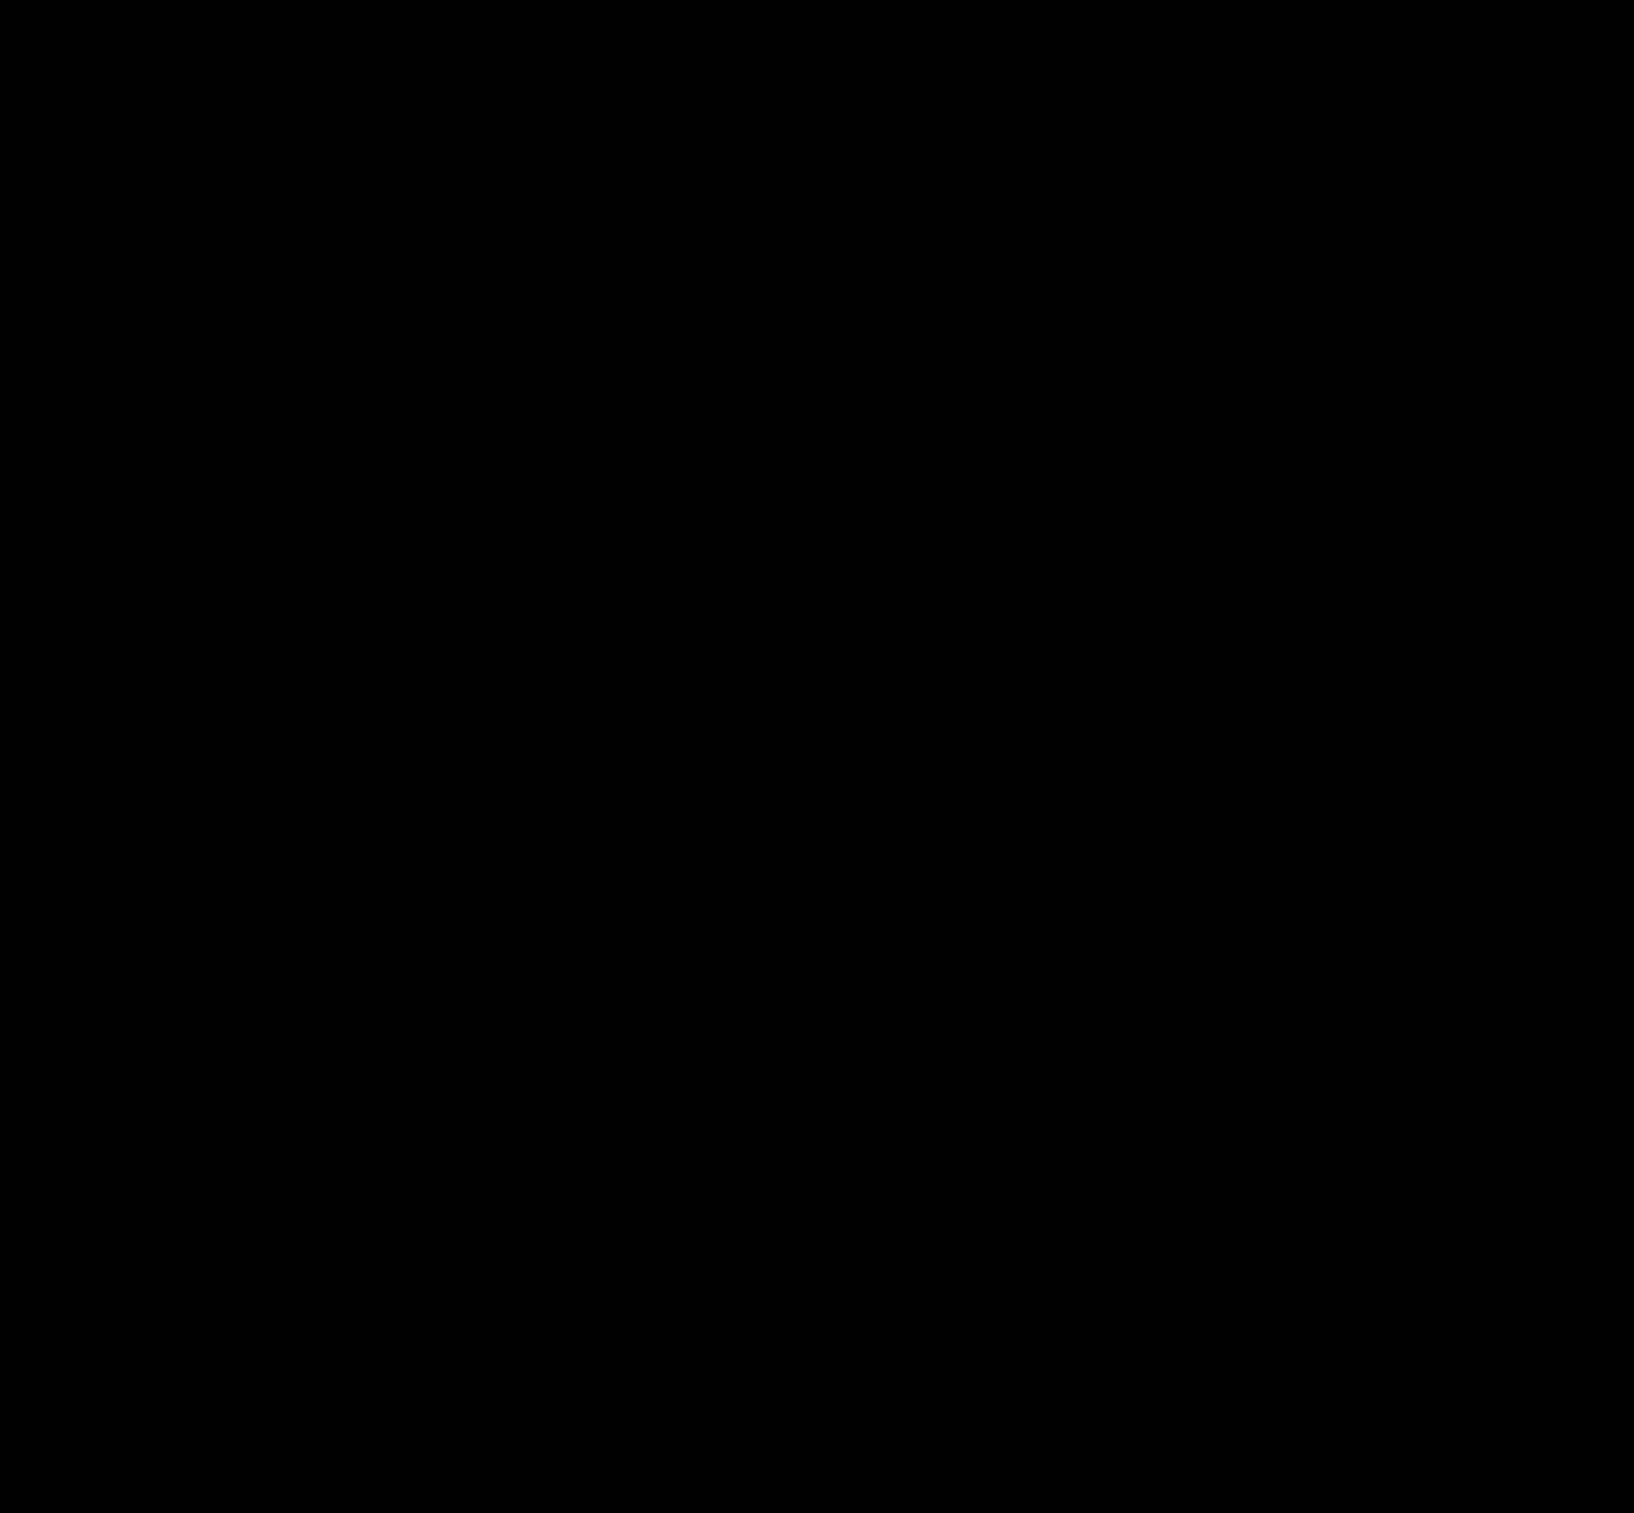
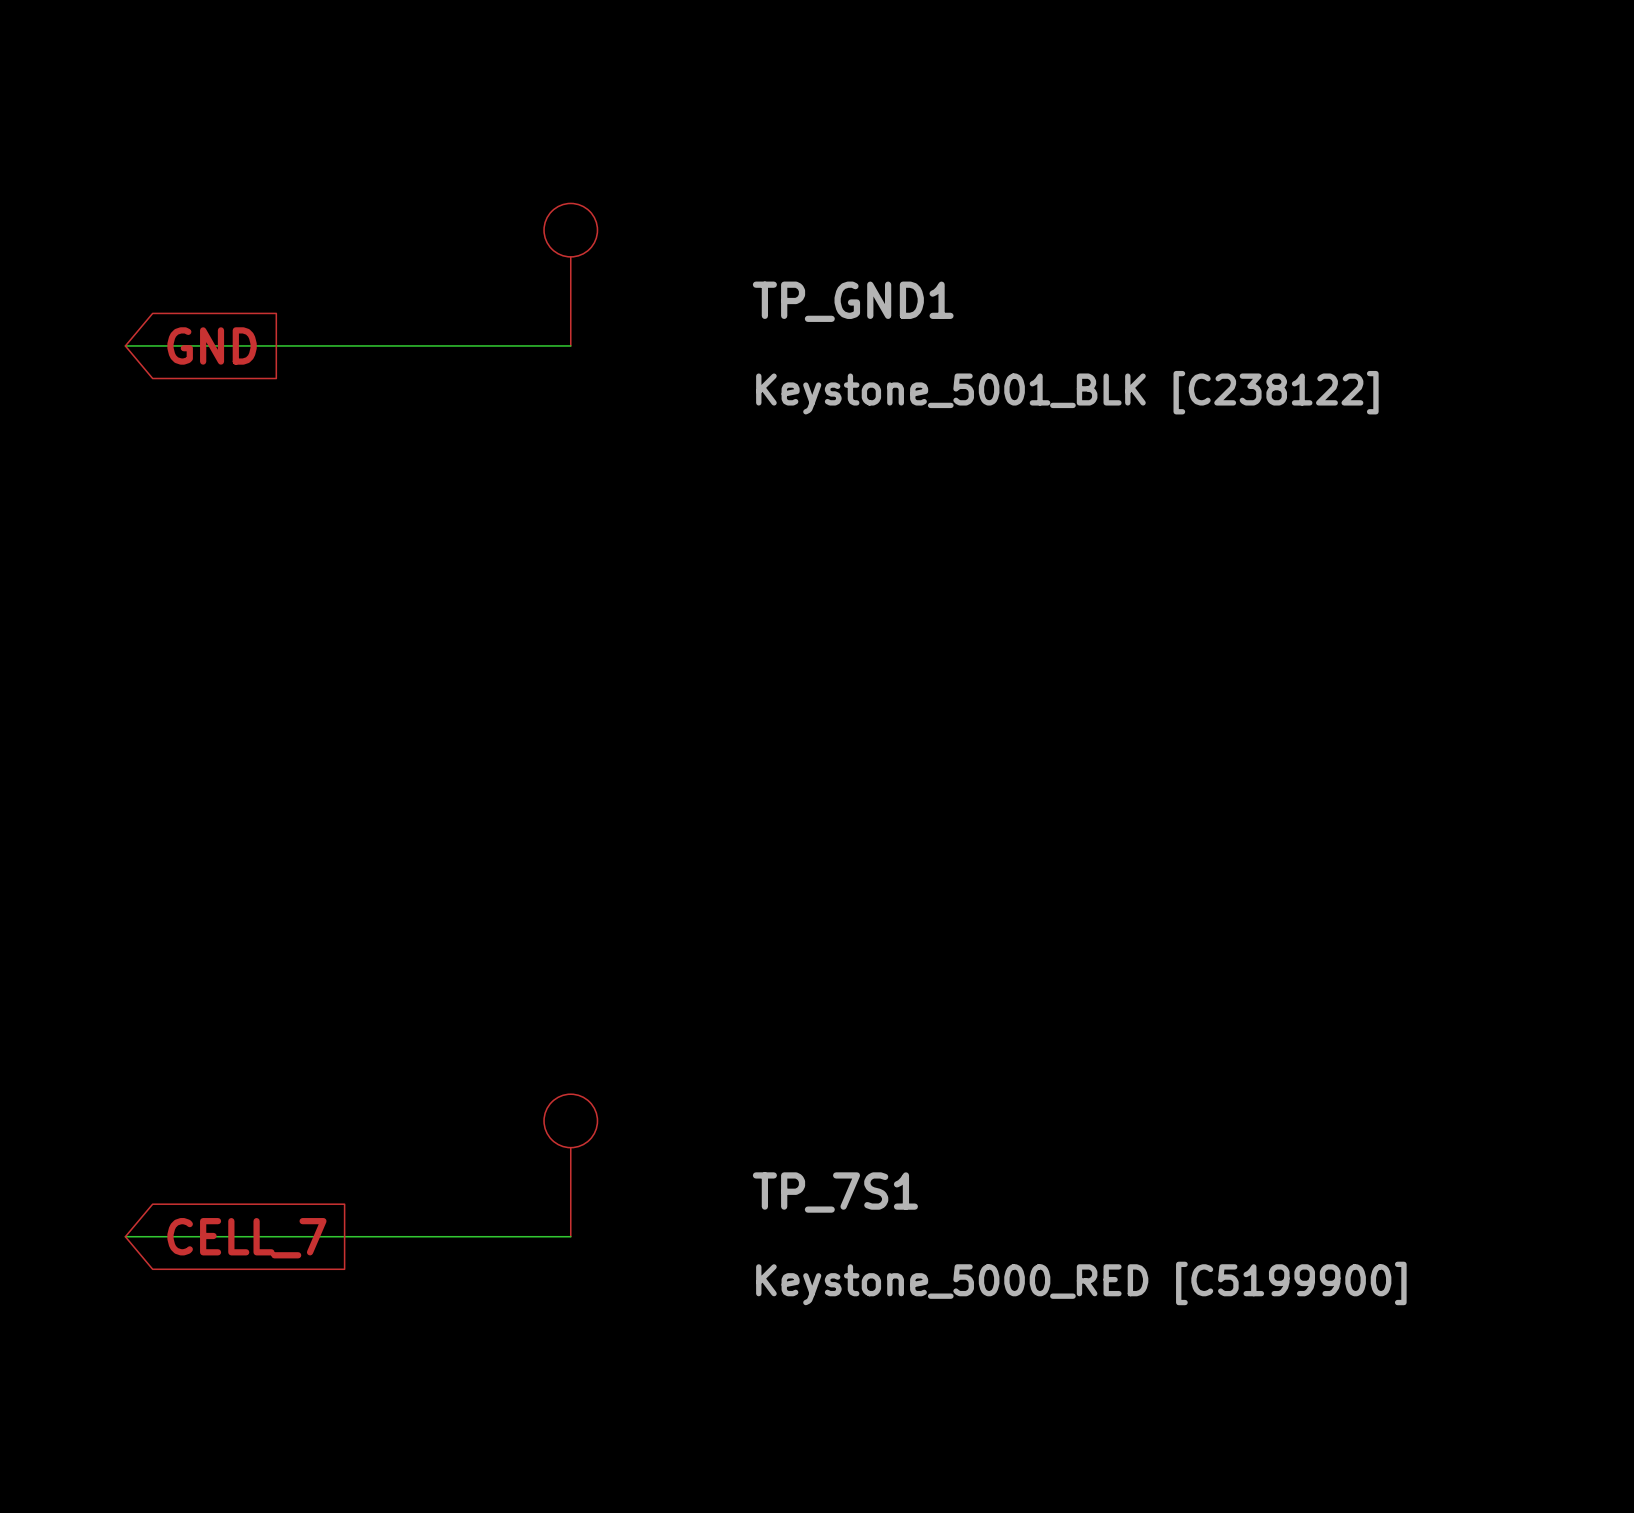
TP_GND1: none -> Keystone_5001_BLK [C238122] (570, 274)
wire: none -> (125, 345) (570, 345)
global label: none -> GND (212, 345)
TP_7S1: none -> Keystone_5000_RED [C5199900] (570, 1165)
wire: none -> (125, 1236) (570, 1236)
global label: none -> CELL_7 (246, 1238)

